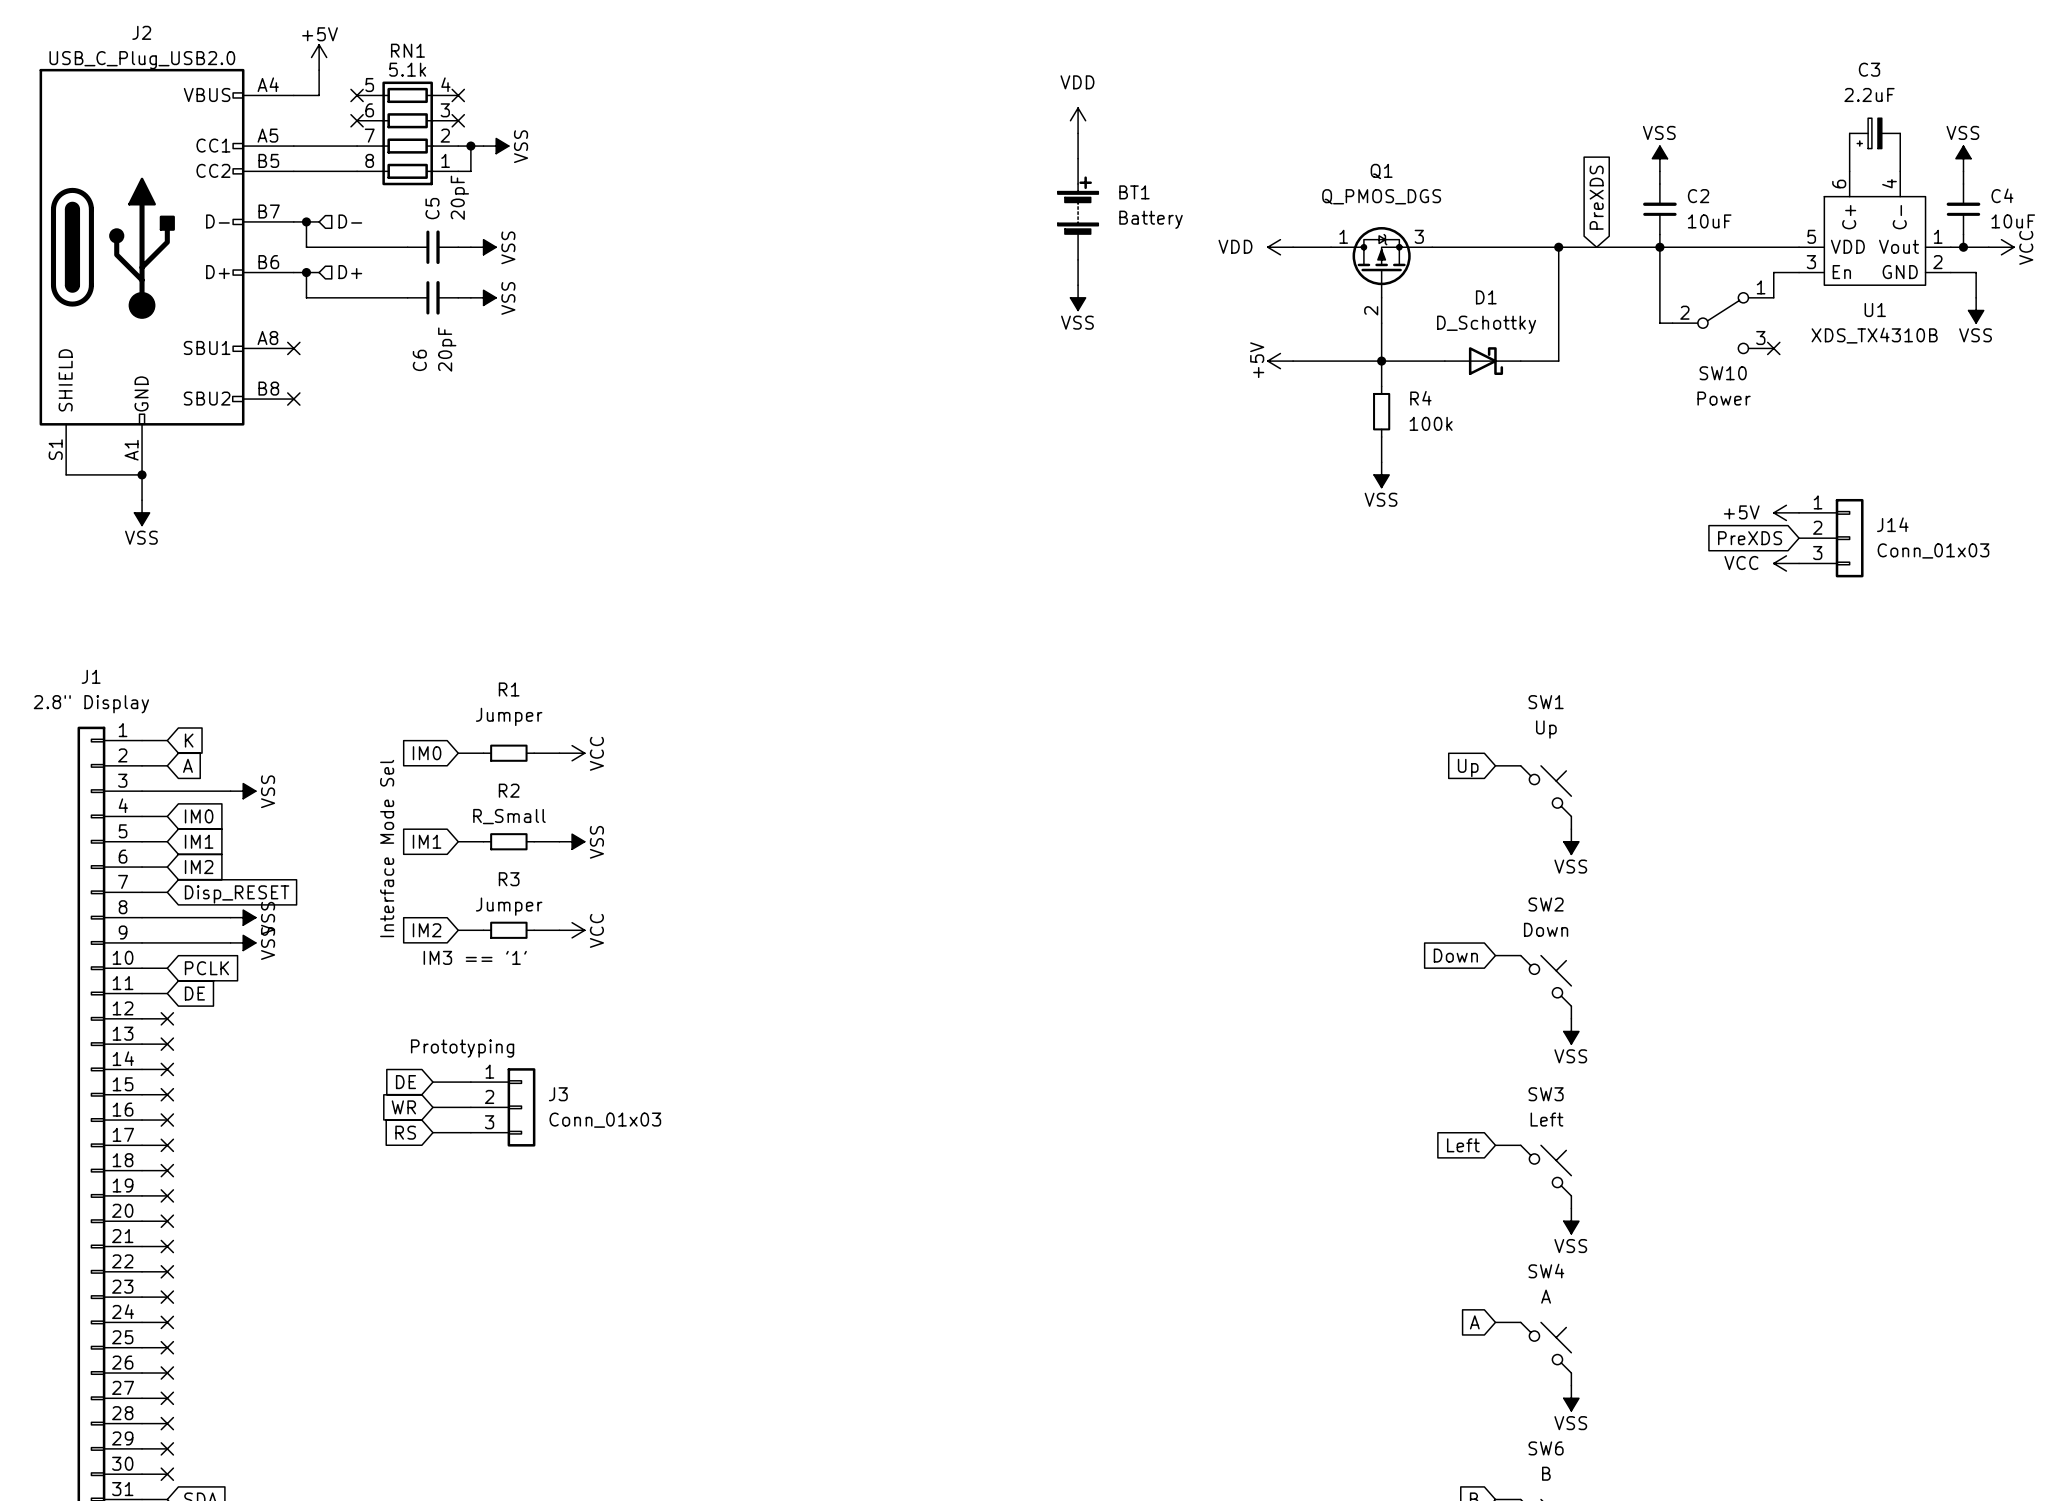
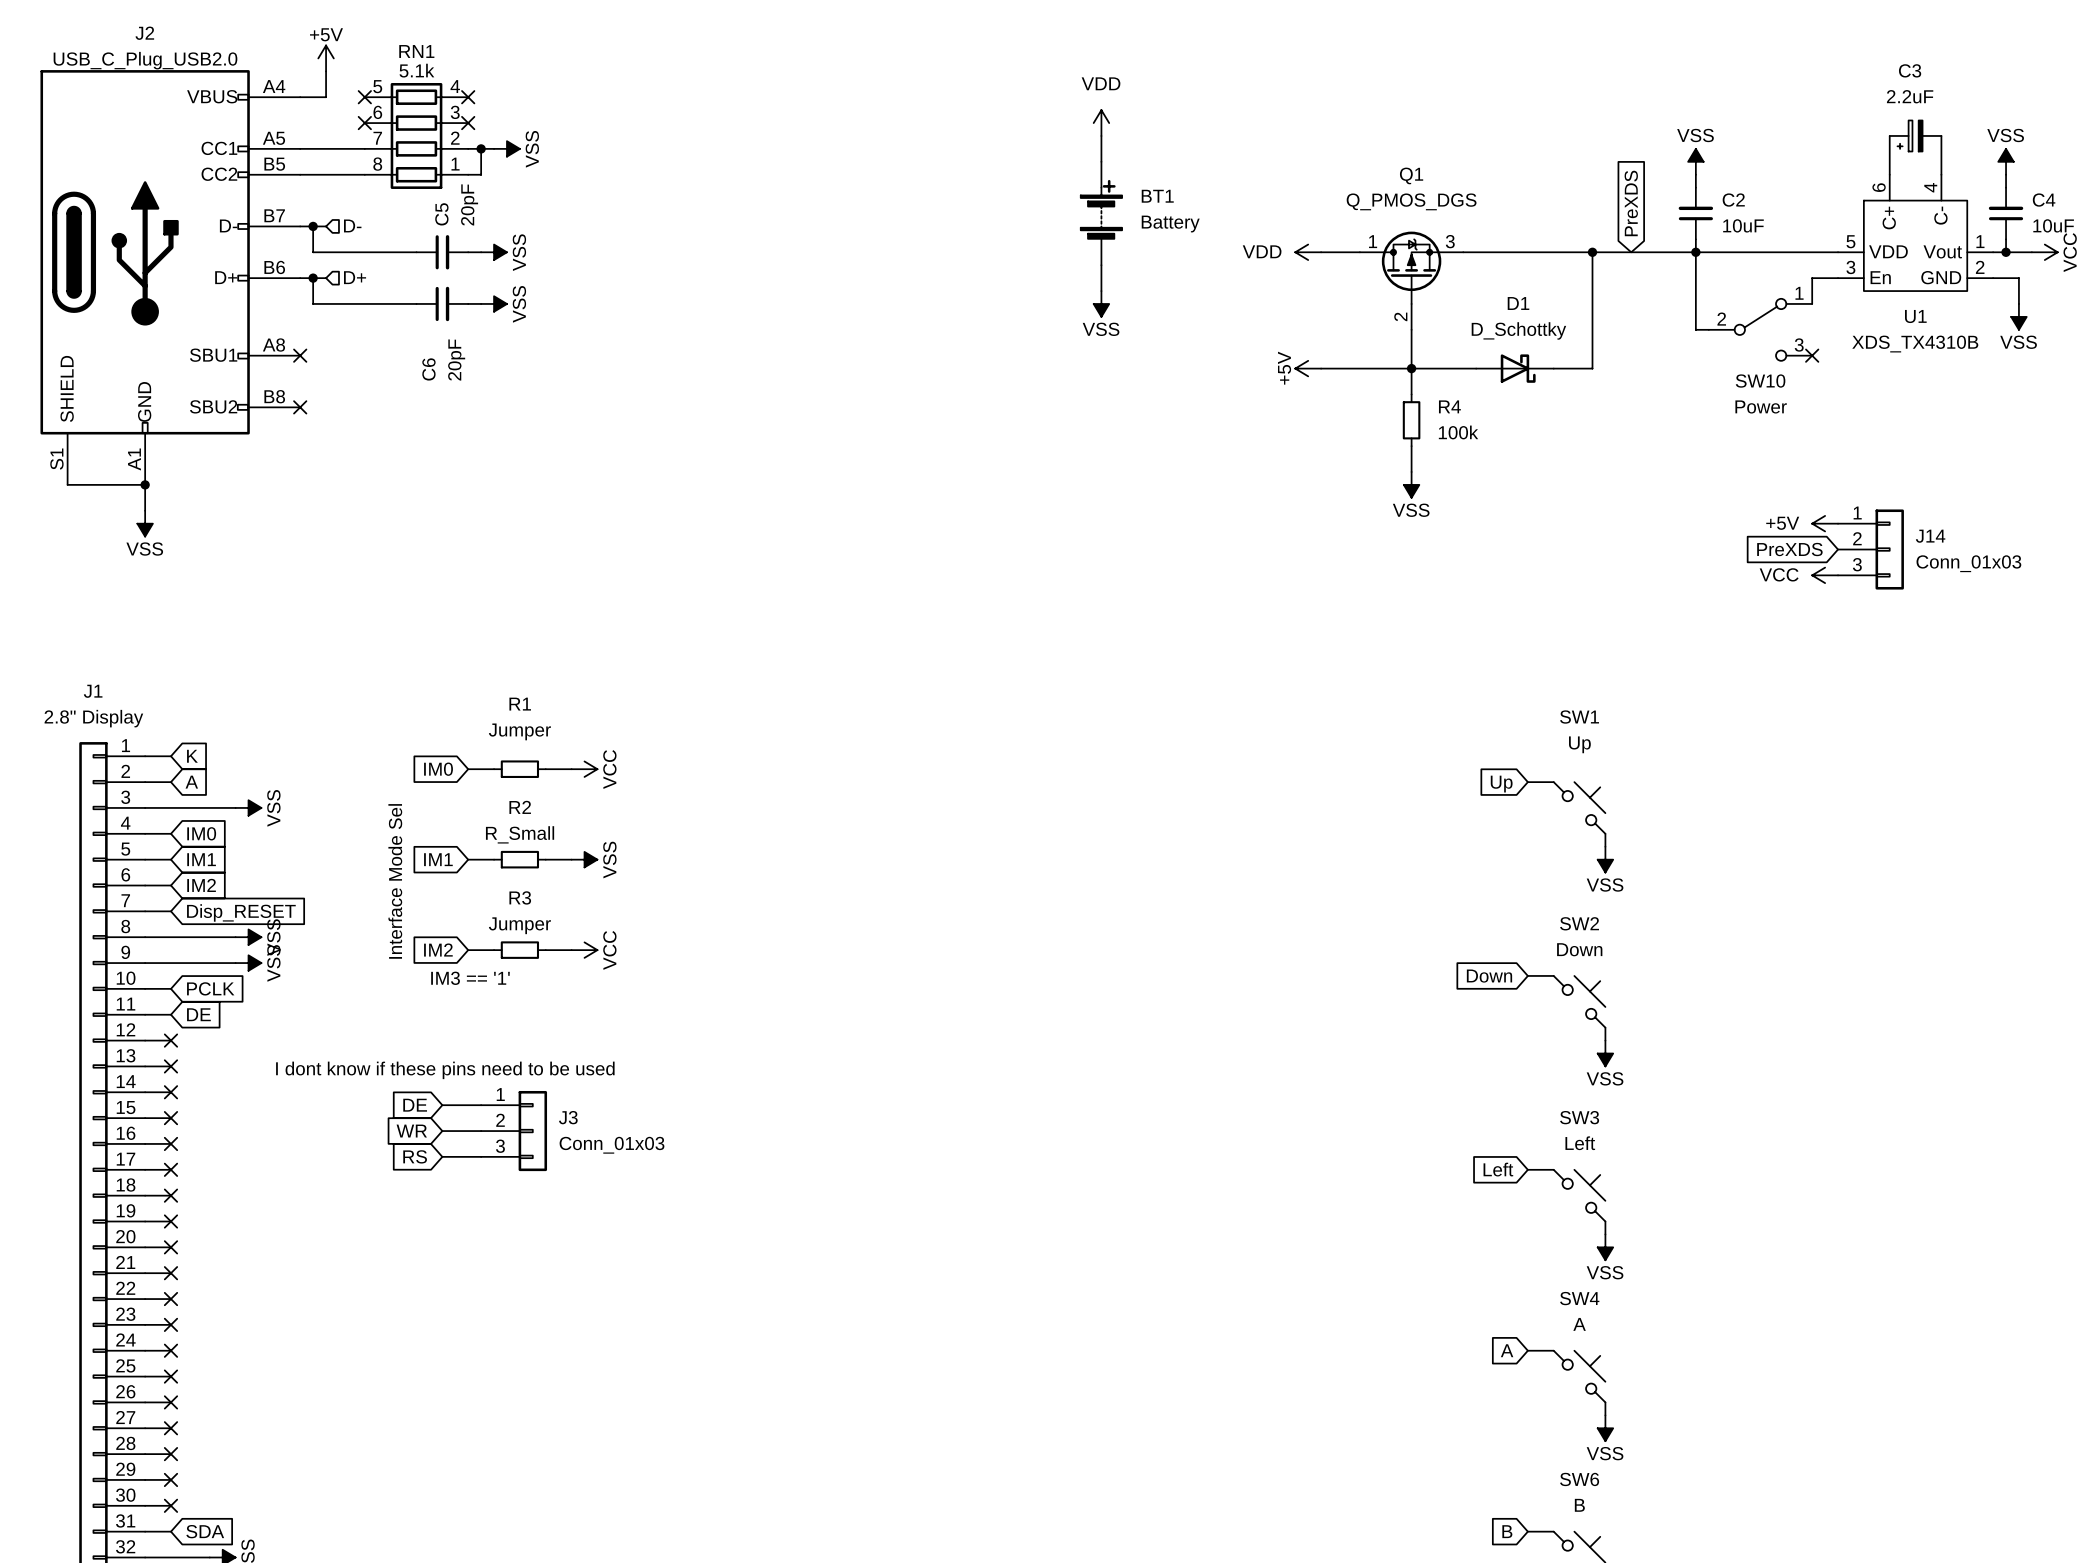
text: Prototyping (462, 1048) -> none
text: none -> I dont know if these pins need to be used (445, 1070)

